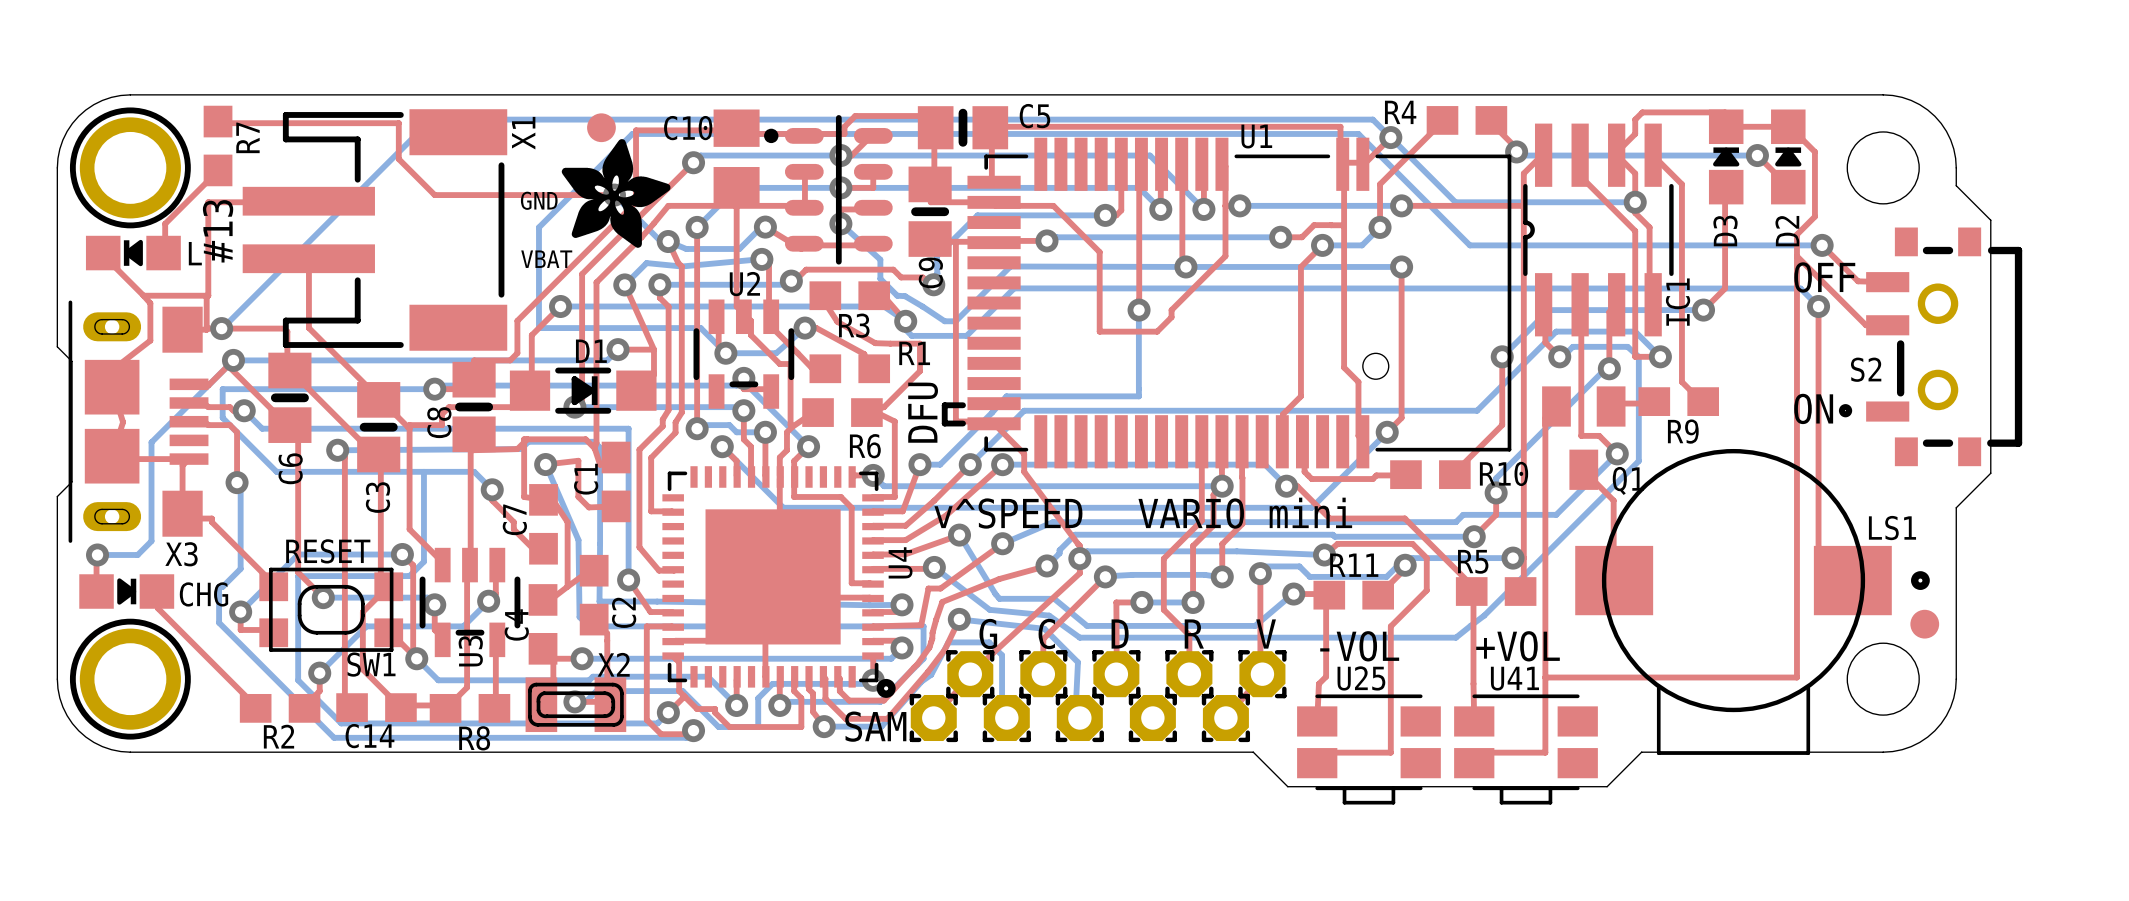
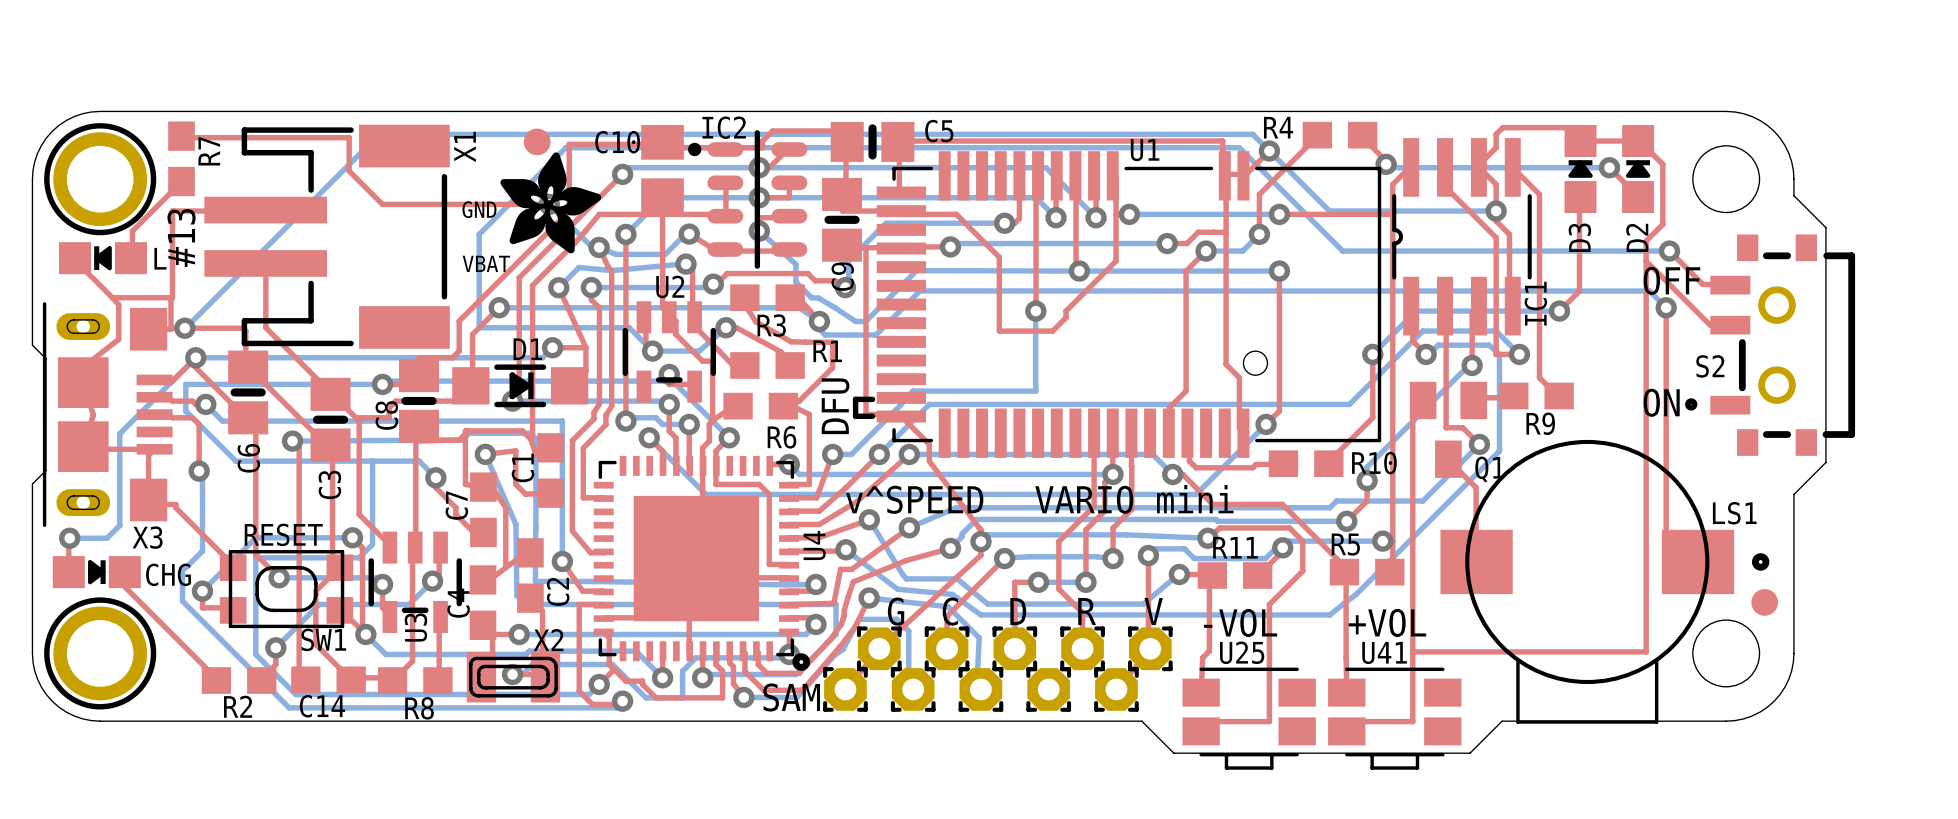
IC2 name: none -> IC2 (724, 127)

